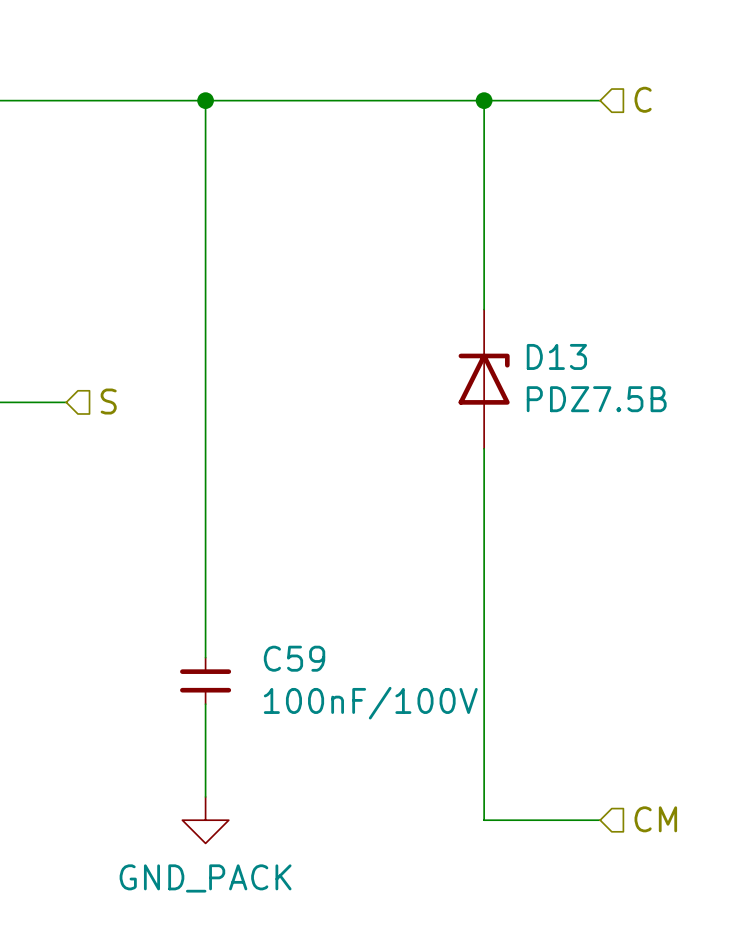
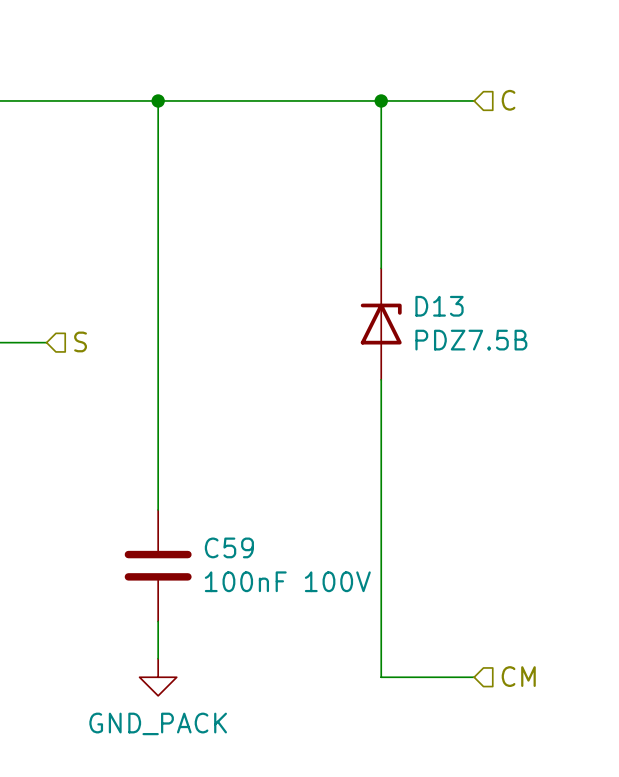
C59 symbol: [180, 657, 232, 705] -> [124, 509, 192, 622]
C59 value: 100nF/100V (370, 703) -> 100nF 100V (287, 581)

